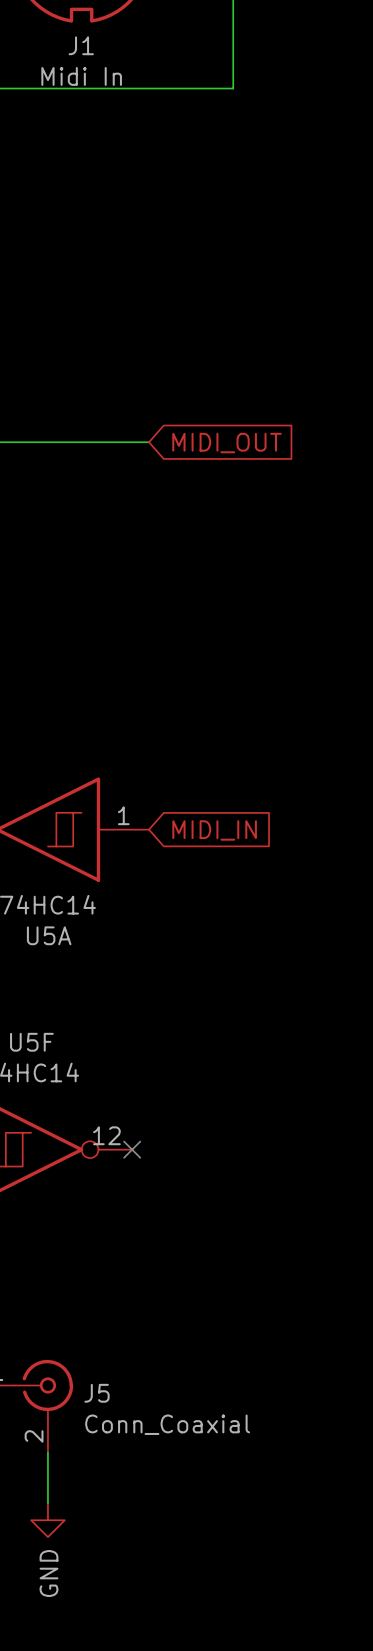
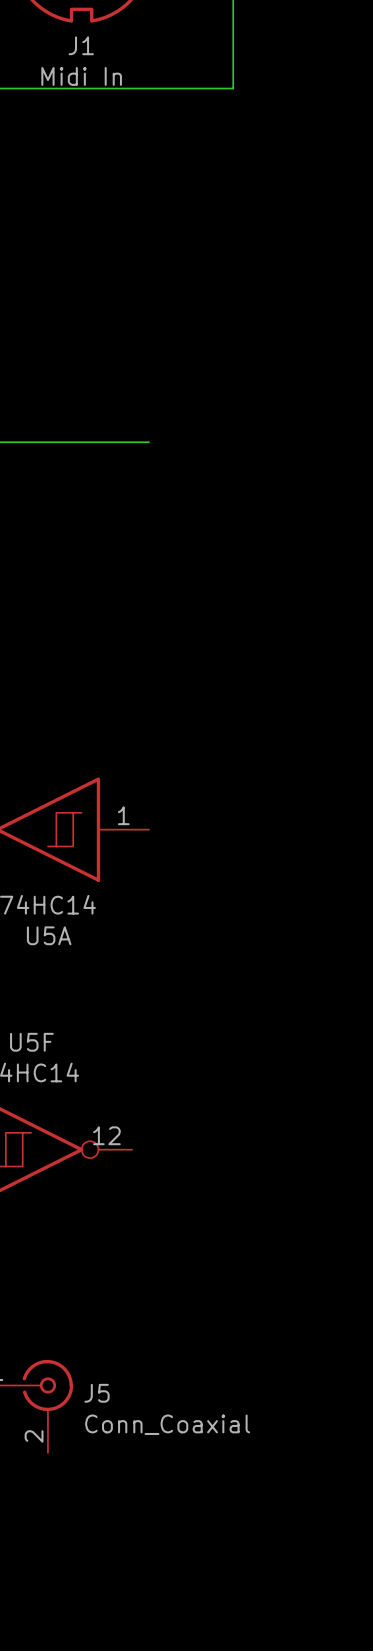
global label: MIDI_OUT (227, 443) -> none
global label: MIDI_IN (214, 830) -> none
no-connect mark: (132, 1149) -> none
wire: (47, 1452) (47, 1503) -> none
power symbol: GND (47, 1520) -> none

